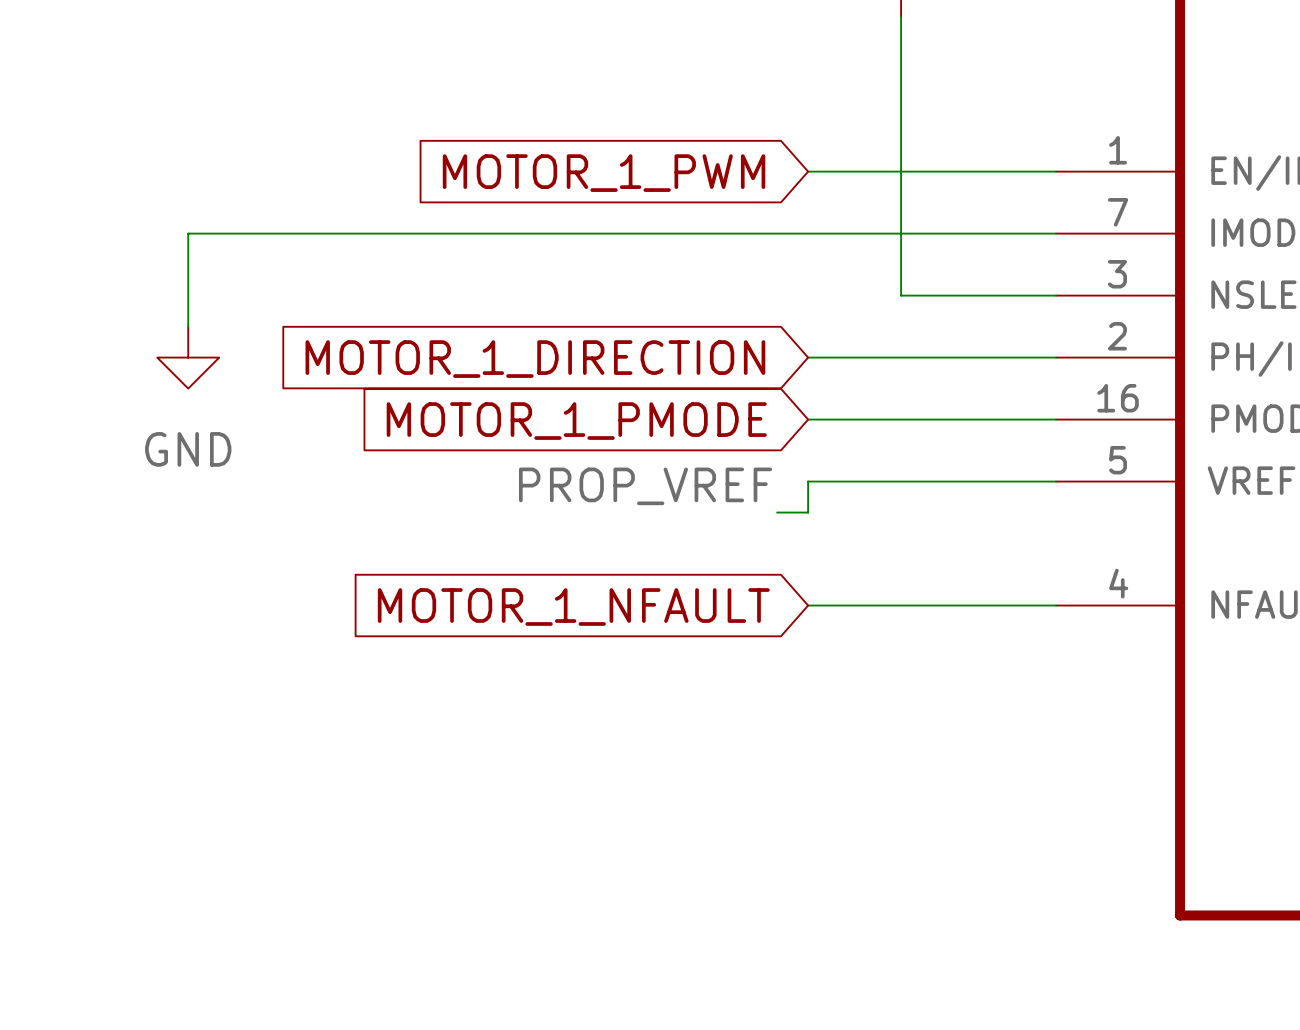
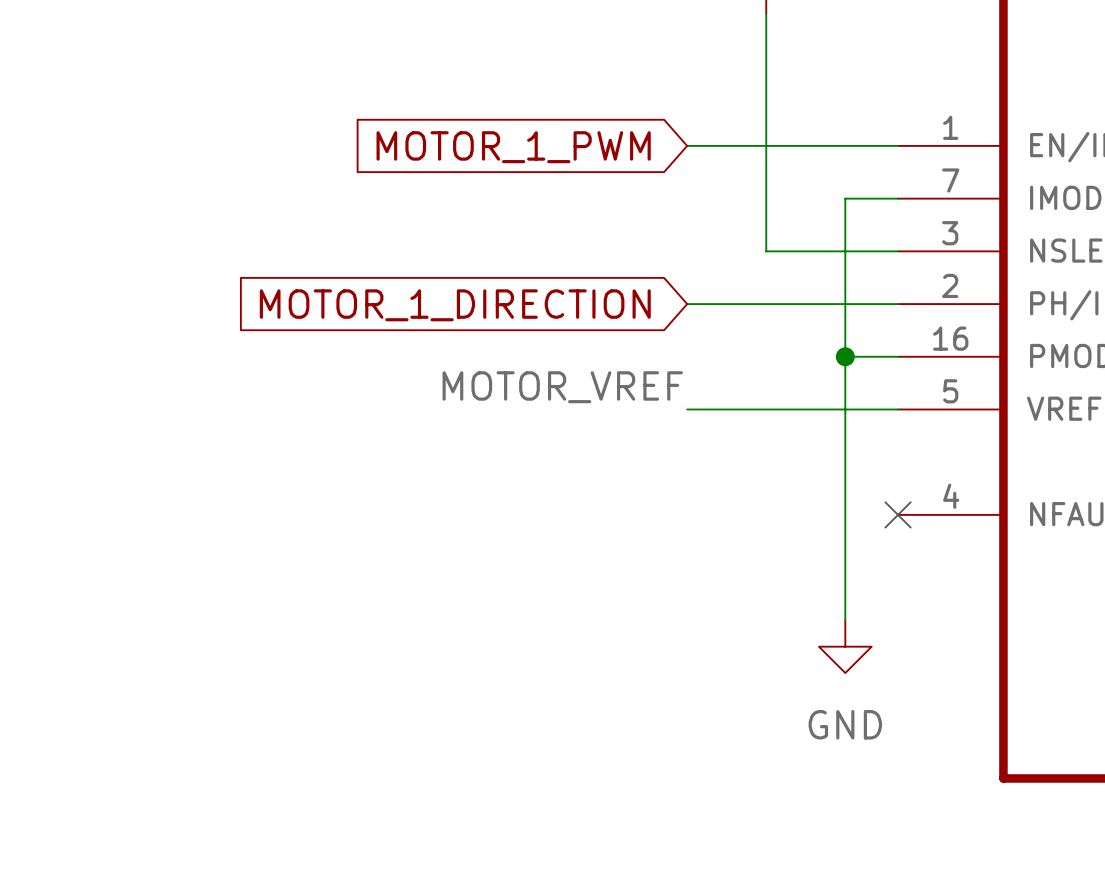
wire: (994, 233) (188, 233) (188, 326) -> (845, 198) (845, 620)
power symbol: GND (188, 357) -> none
wire: (808, 419) (994, 419) -> none
junction: none -> (845, 356)
global label: MOTOR_1_PMODE (576, 421) -> none
wire: (808, 481) (808, 512) (777, 512) -> none
label: PROP_VREF (645, 486) -> MOTOR_VREF (562, 387)
wire: (808, 605) (1056, 605) -> none
no-connect mark: none -> (898, 514)
global label: MOTOR_1_NFAULT (573, 607) -> none
power symbol: none -> GND (845, 646)

